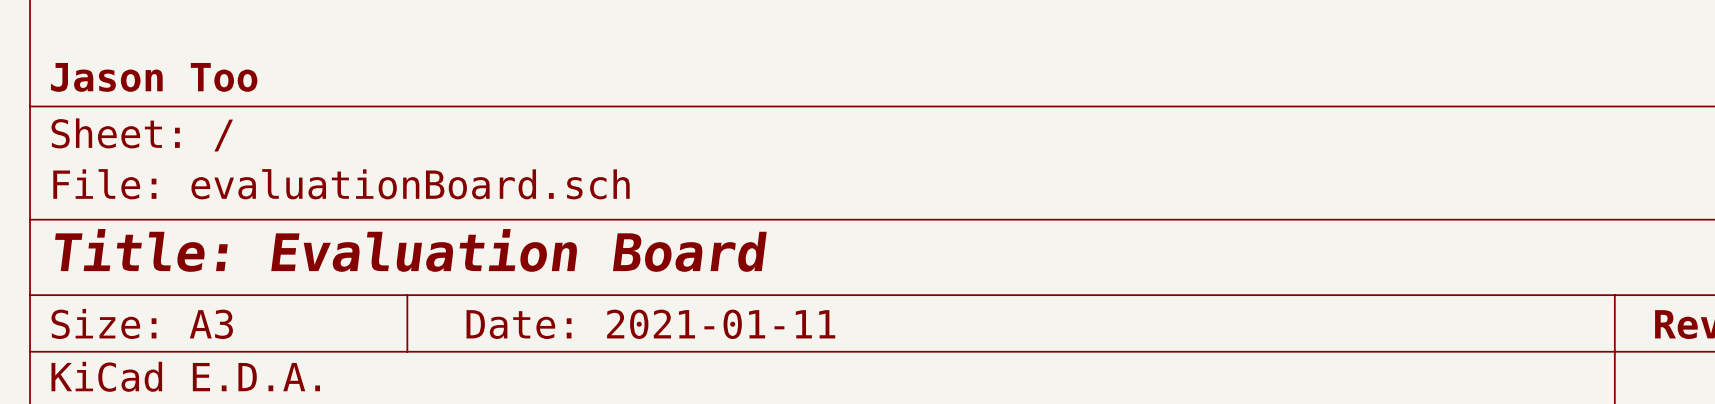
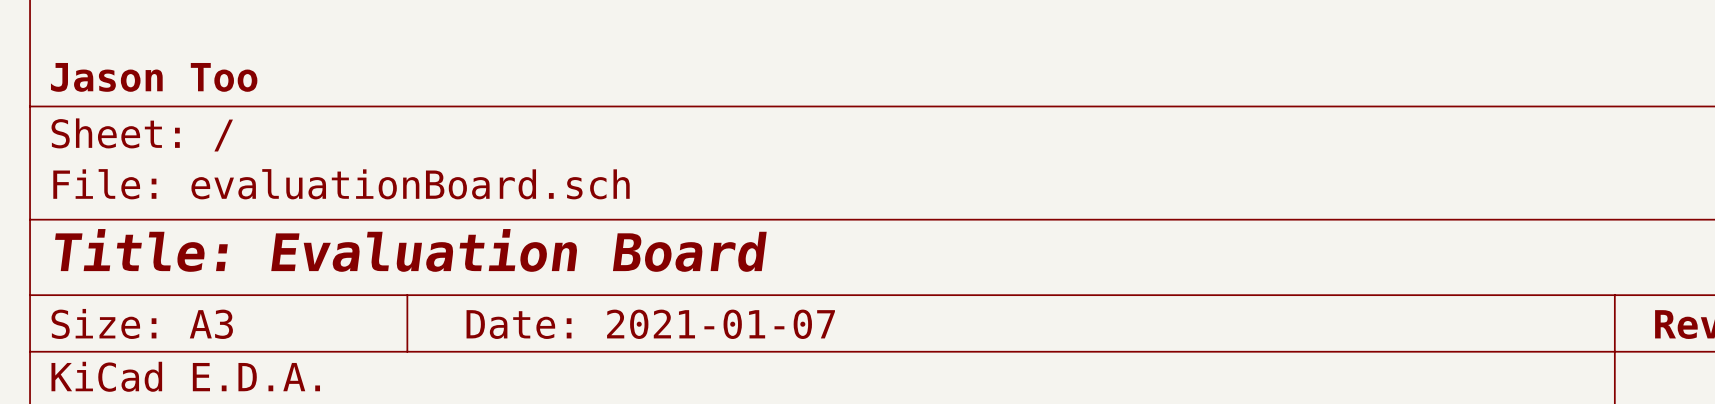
title block: Date: 2021-01-11 (650, 324) -> Date: 2021-01-07 (650, 324)

